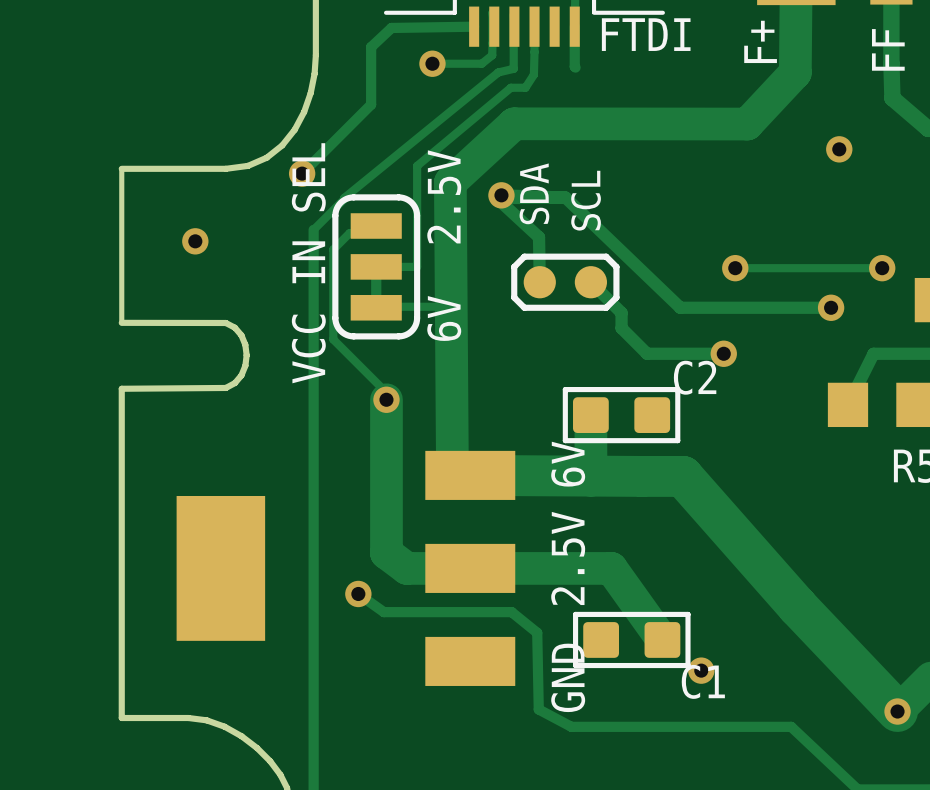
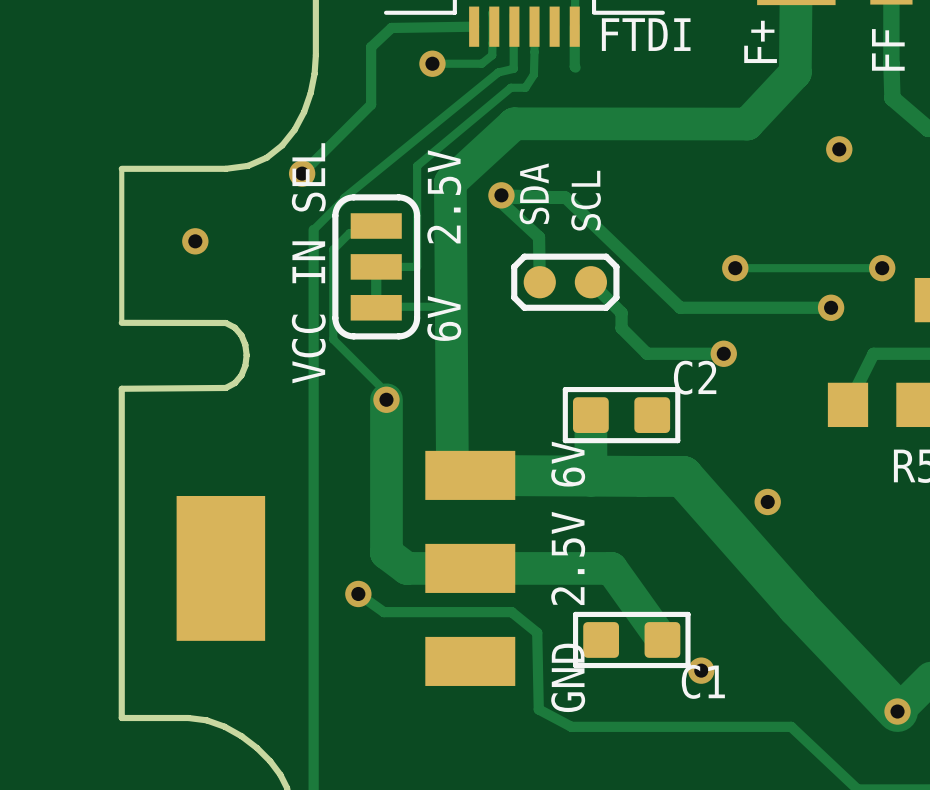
via: none -> (767, 501)

